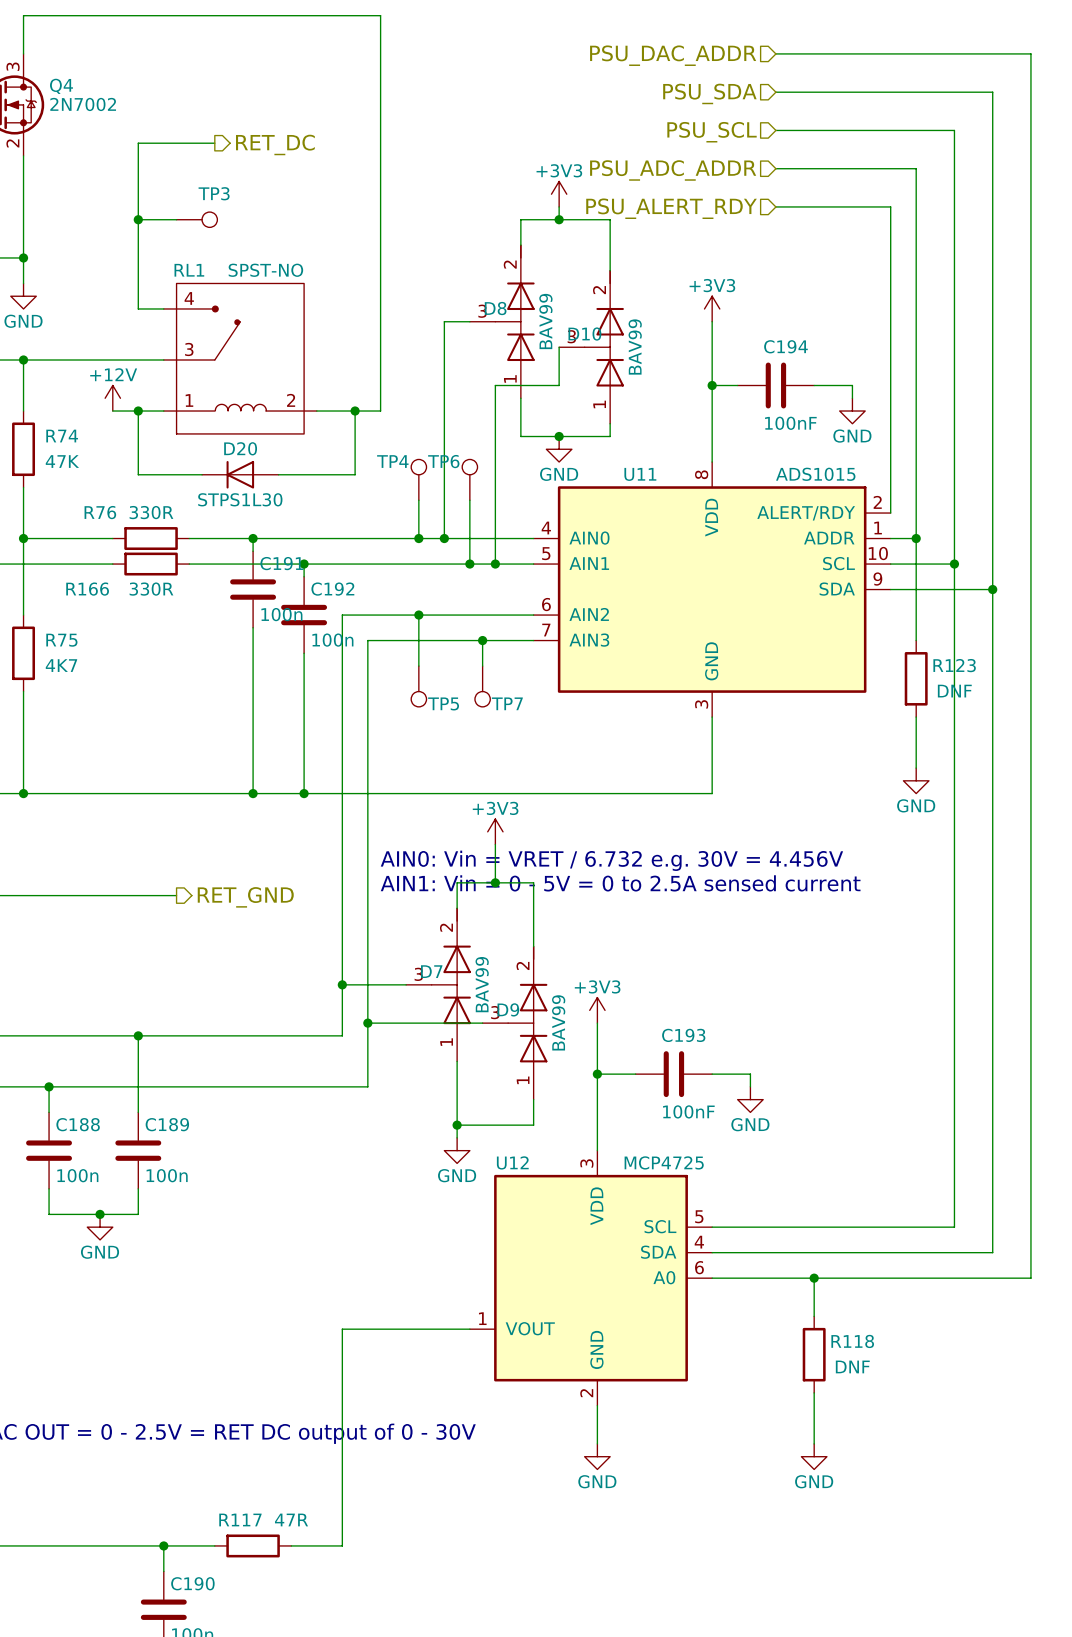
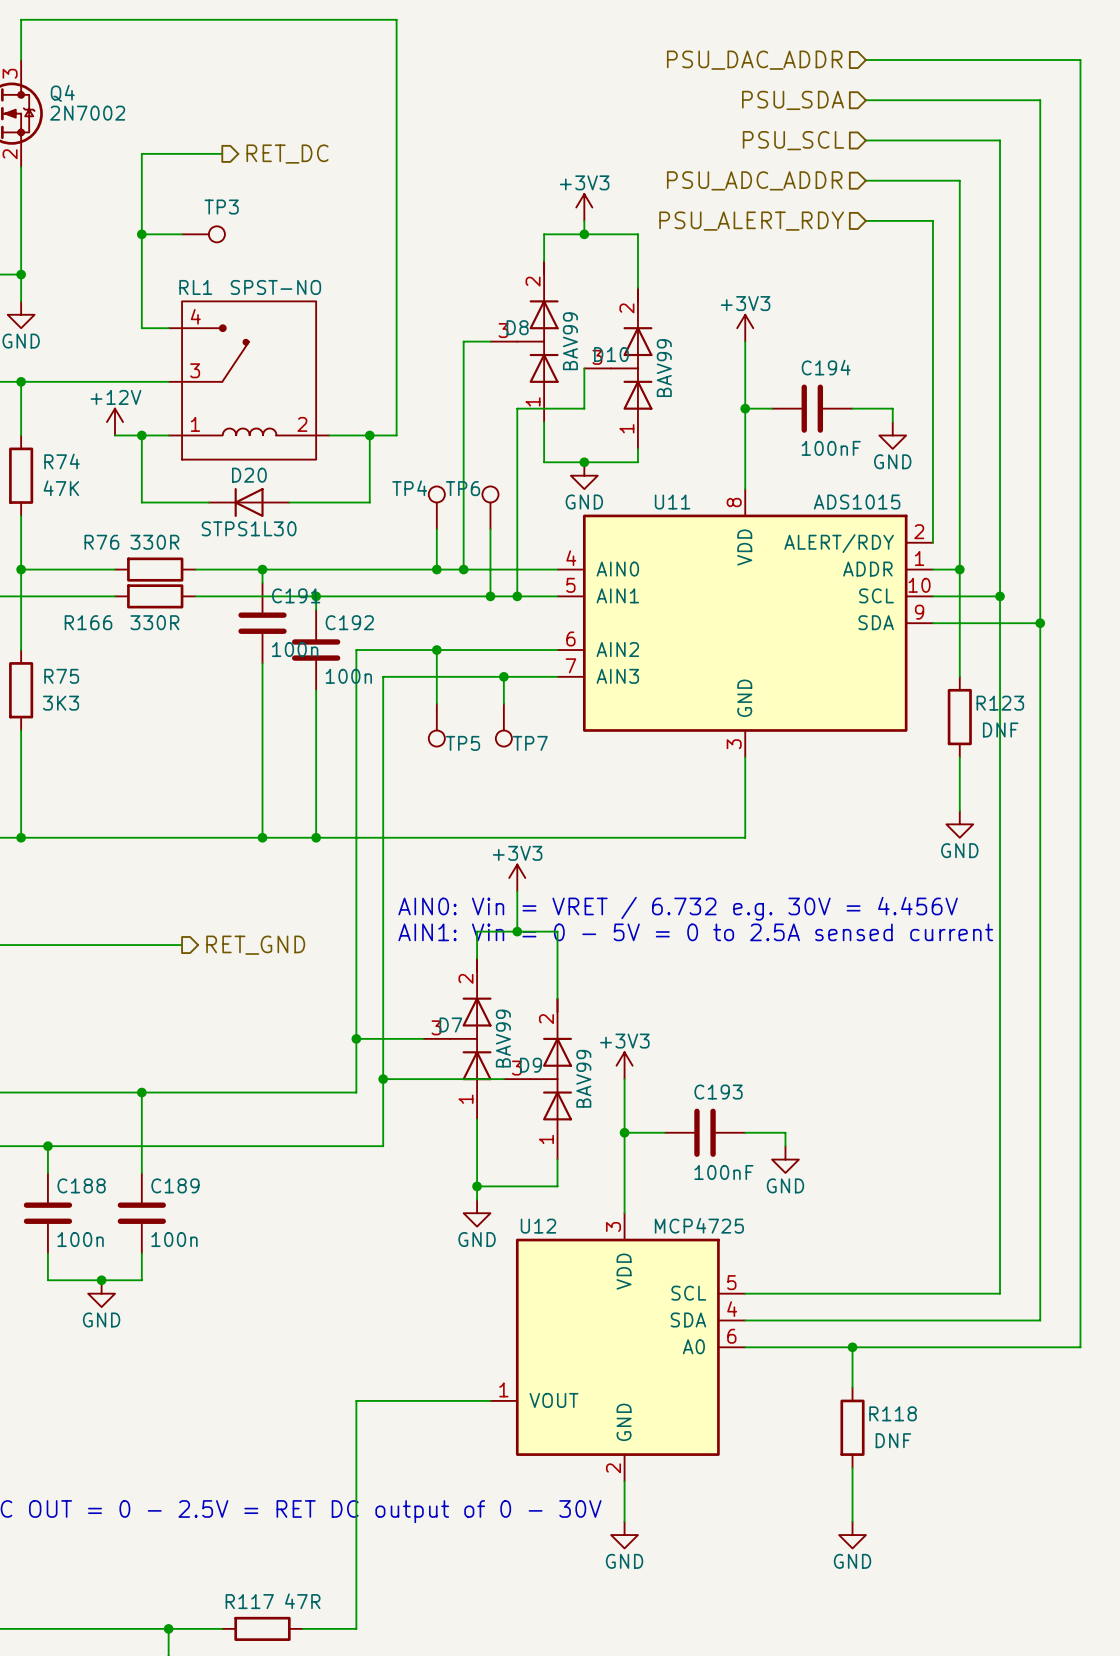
wire: (775, 53) (826, 53) -> none
hierarchical label position: PSU_DAC_ADDR (673, 55) -> PSU_DAC_ADDR (754, 60)
wire: (775, 92) (826, 92) -> none
hierarchical label position: PSU_SDA (709, 93) -> PSU_SDA (793, 100)
wire: (775, 130) (826, 130) -> none
hierarchical label position: PSU_SCL (712, 132) -> PSU_SCL (793, 140)
wire: (775, 168) (826, 168) -> none
hierarchical label position: PSU_ADC_ADDR (673, 170) -> PSU_ADC_ADDR (754, 180)
wire: (775, 206) (826, 206) -> none
hierarchical label position: PSU_ALERT_RDY (671, 208) -> PSU_ALERT_RDY (751, 221)
R75 value: 4K7 (61, 665) -> 3K3 (61, 703)

